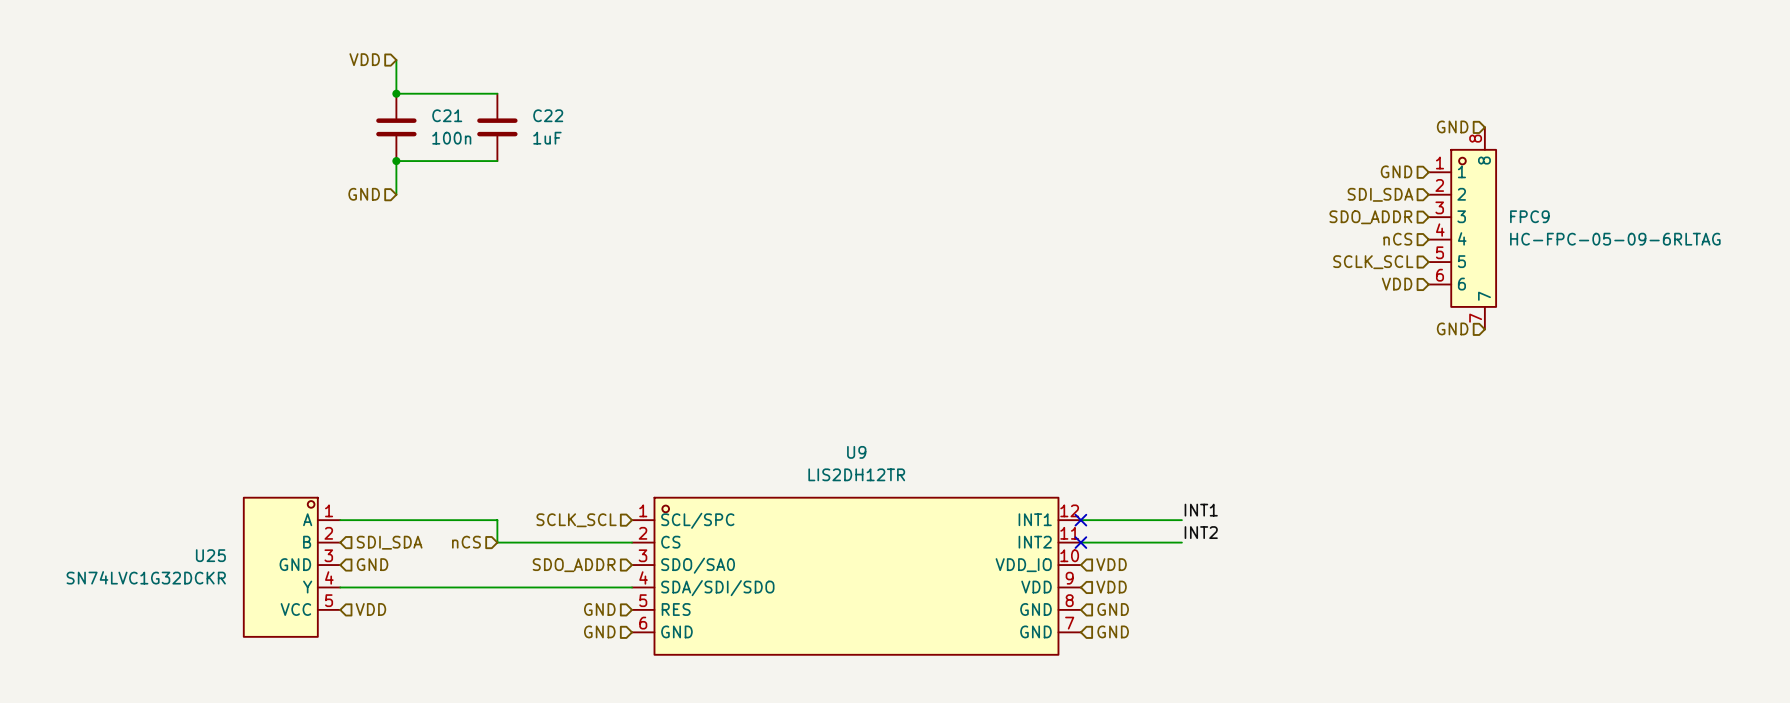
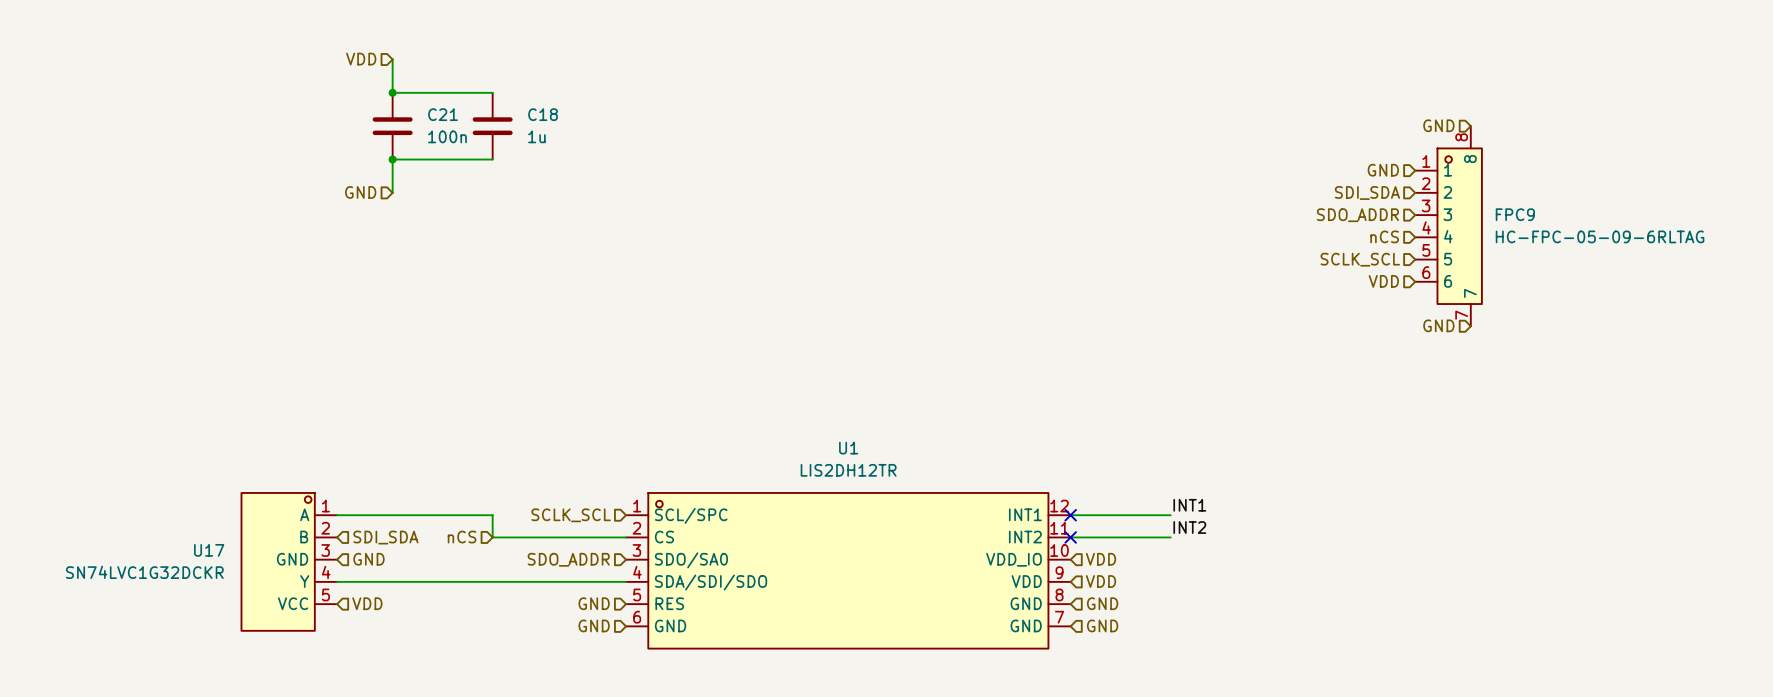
C22 name: C22 (548, 115) -> C18 (543, 114)
C22 value: 1uF (547, 138) -> 1u (536, 136)
U9 name: U9 (856, 452) -> U1 (848, 448)
U25 name: U25 (210, 555) -> U17 (209, 550)

